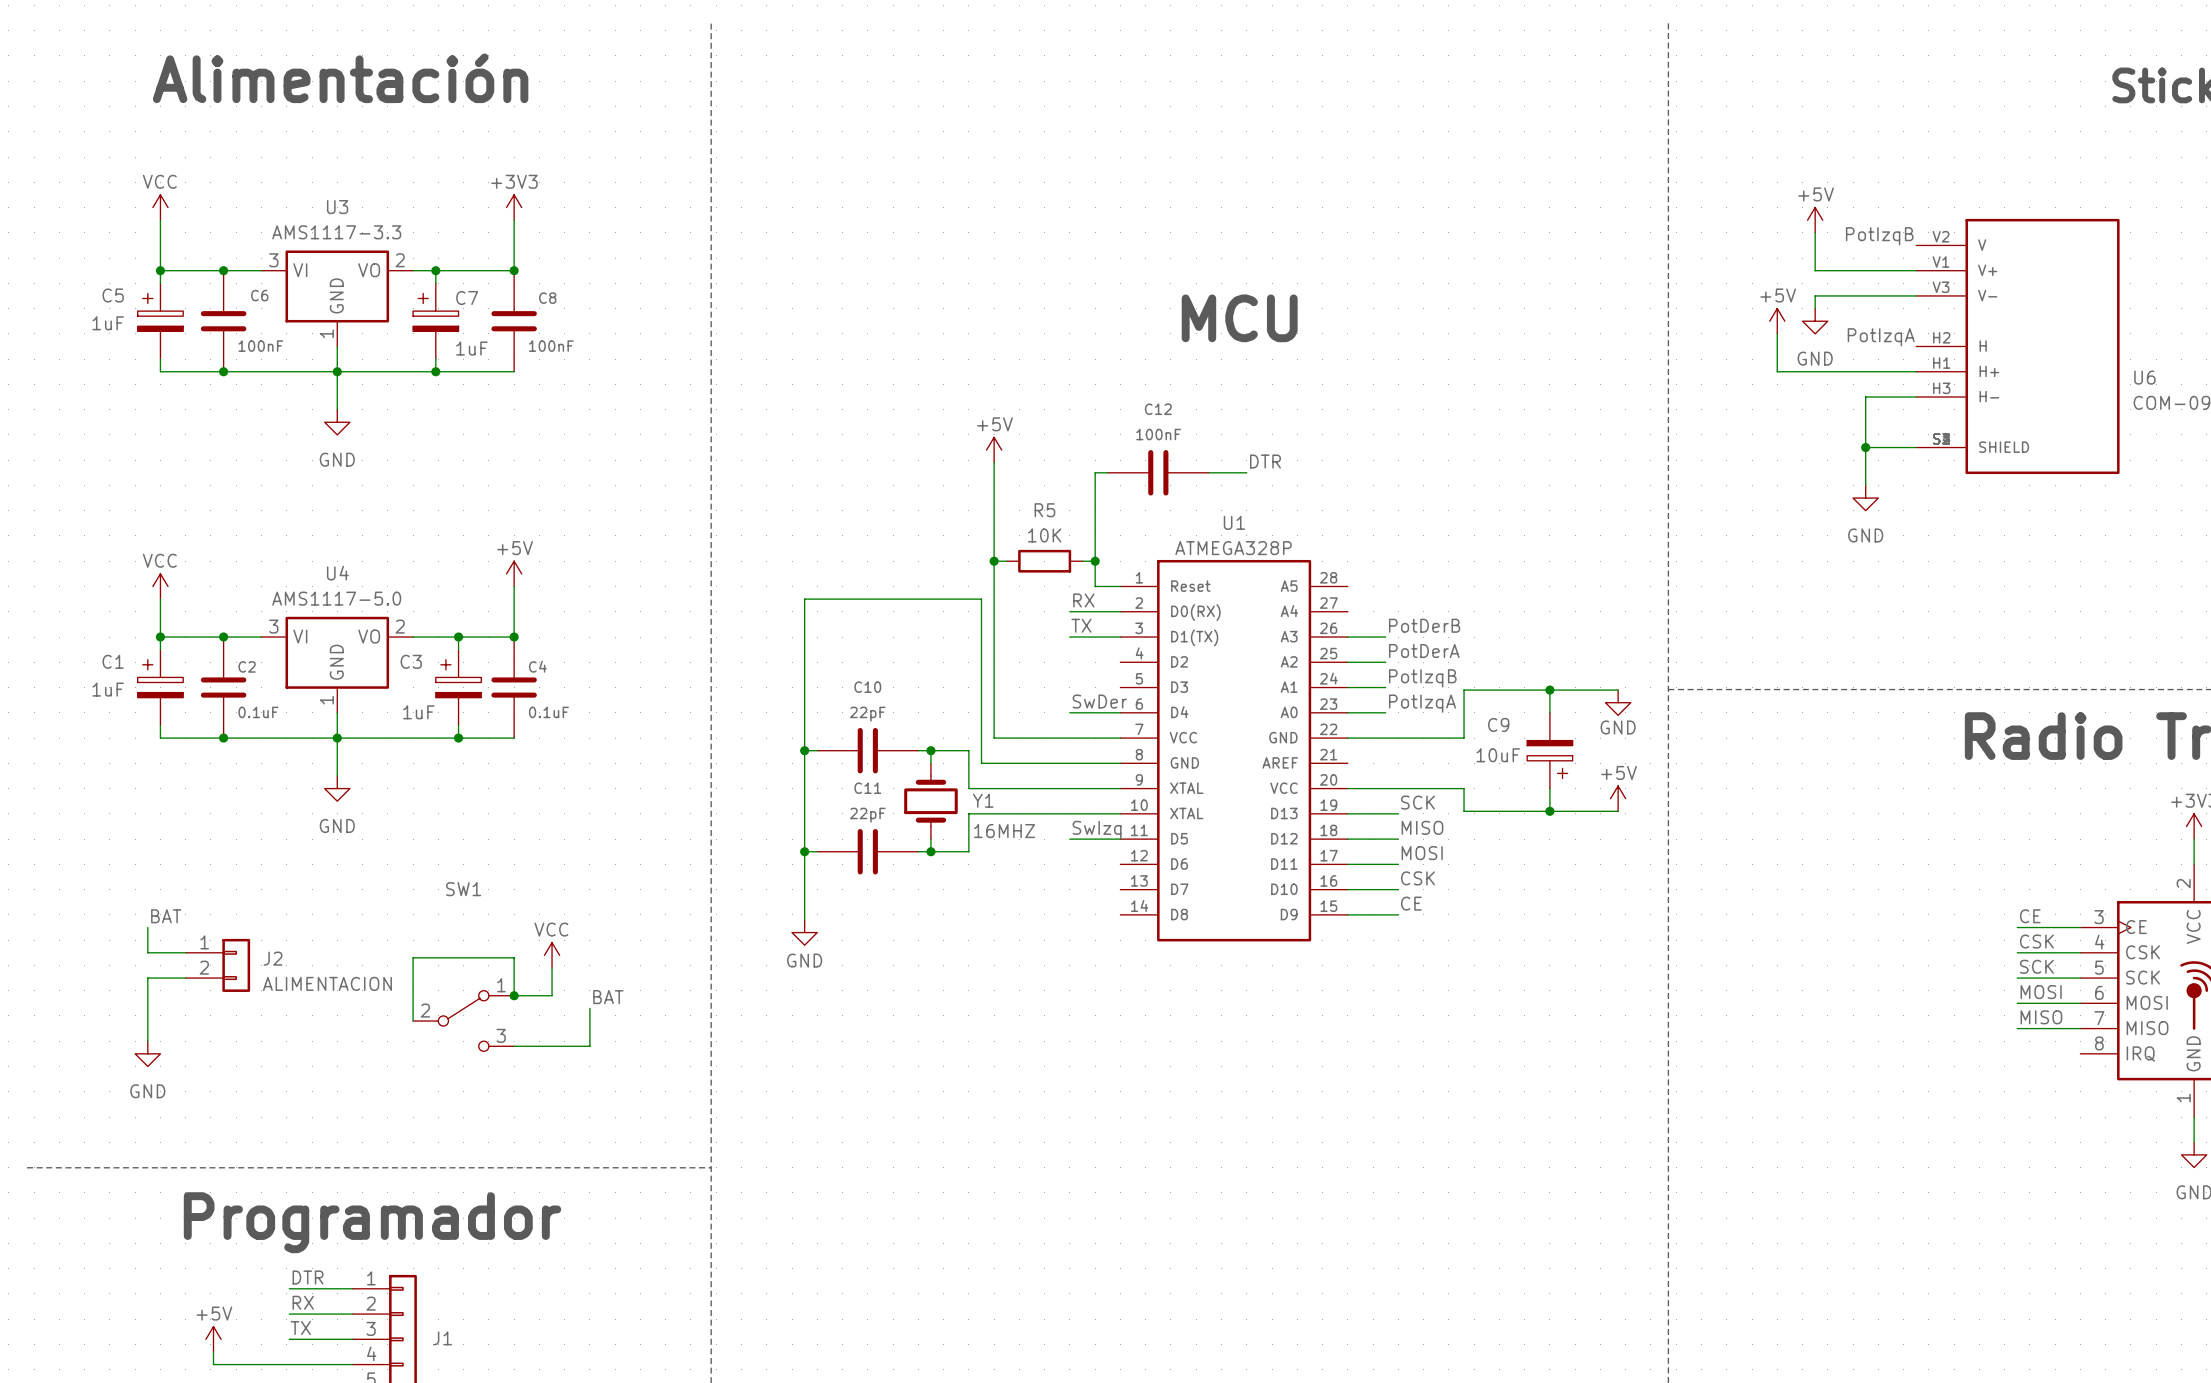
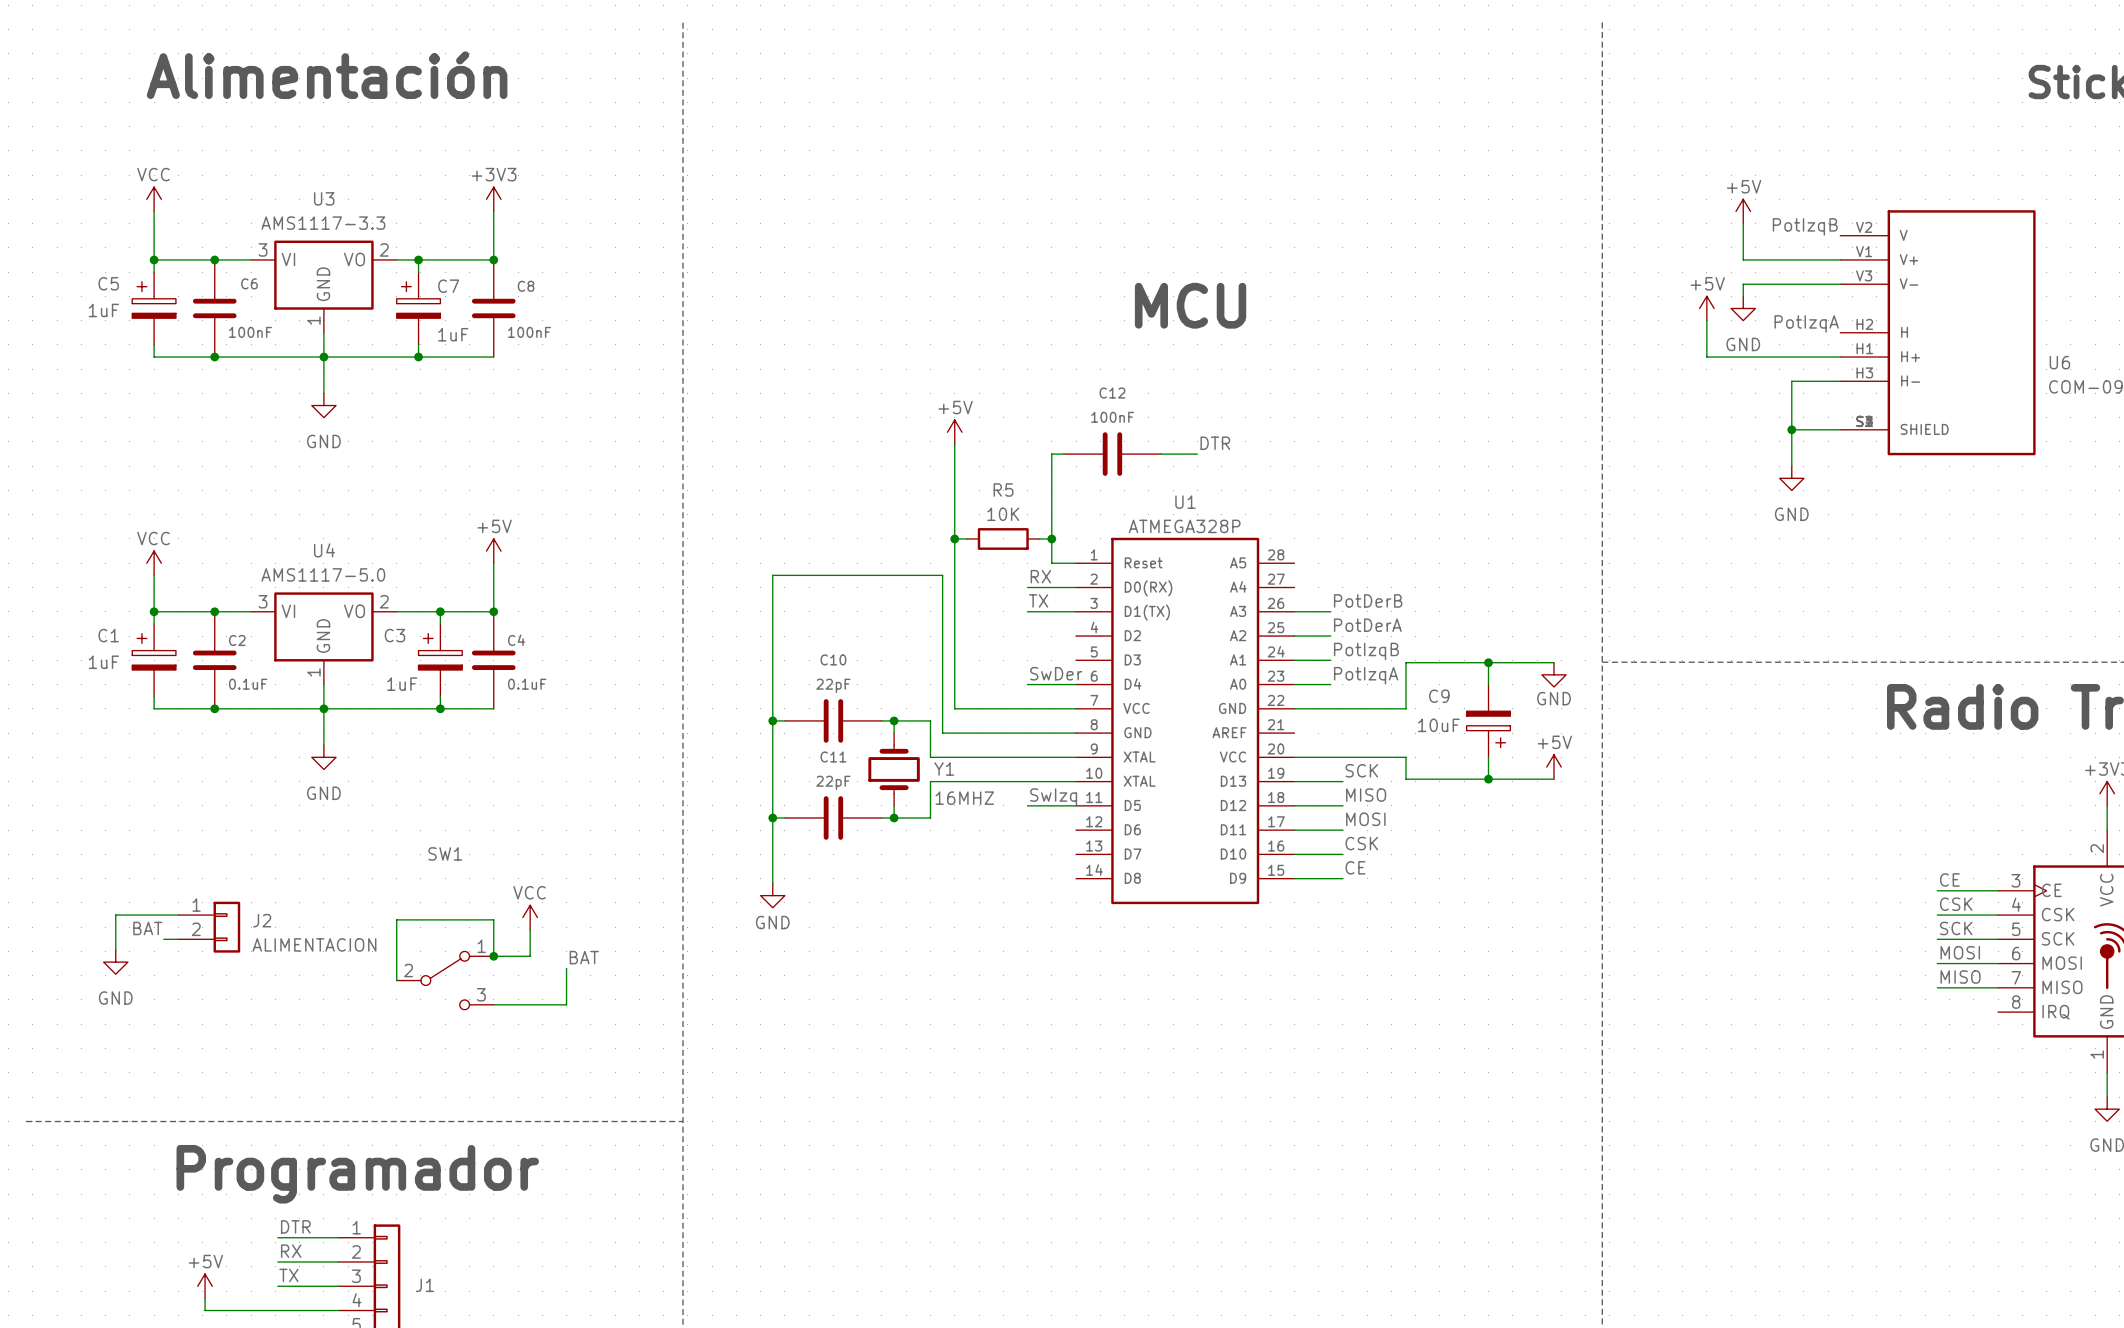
label position: BAT (166, 916) -> BAT (147, 928)
wire: (147, 927) (147, 952) -> (115, 949) (115, 915) (141, 915)
wire: (170, 978) (147, 978) (147, 1041) -> none
power symbol position: GND (147, 1053) -> GND (115, 962)

